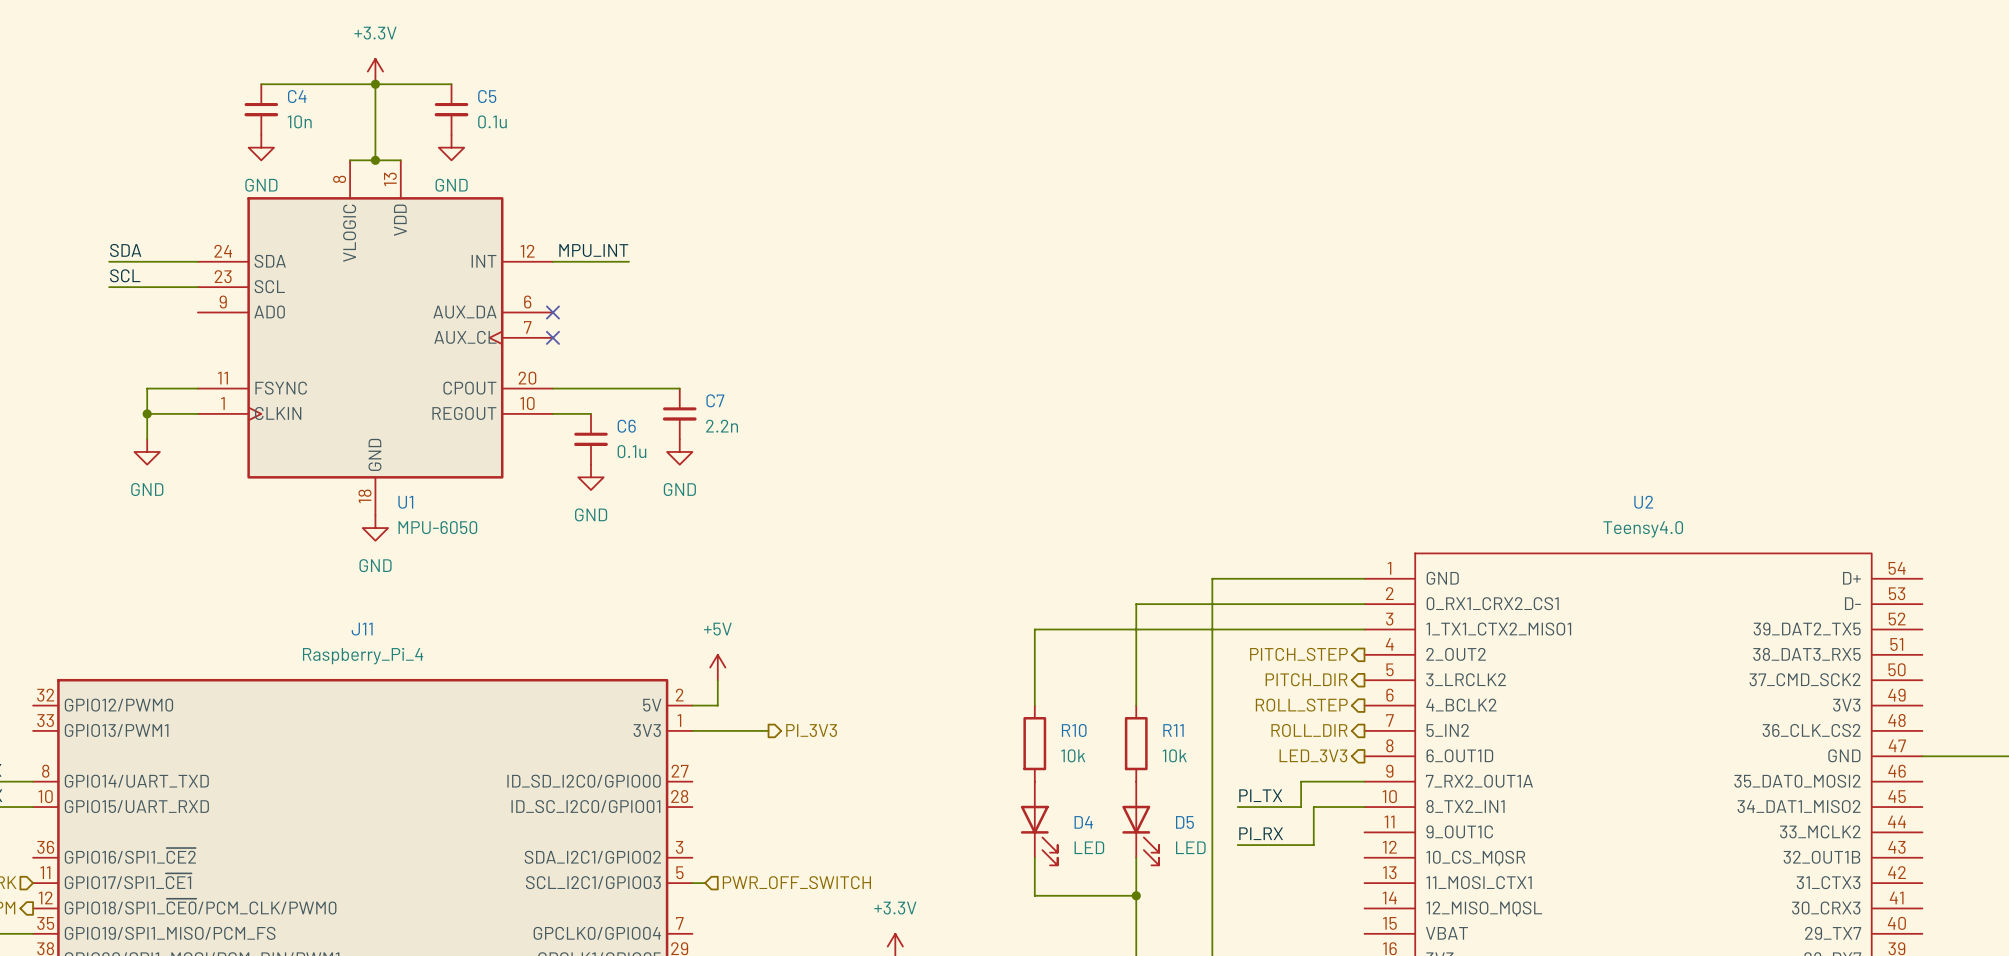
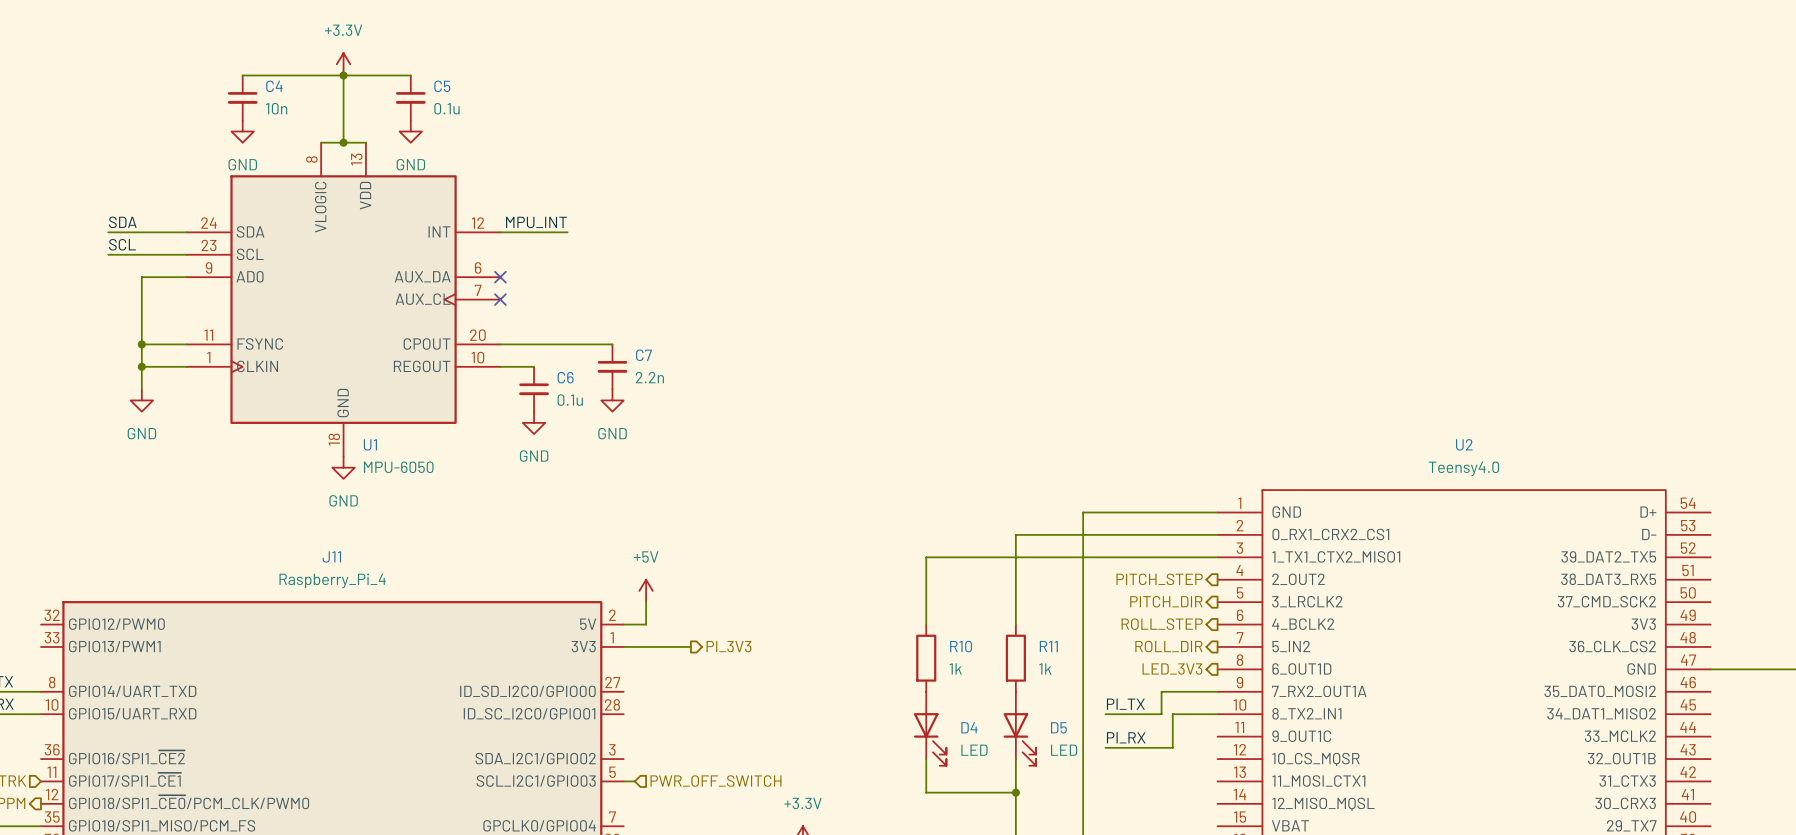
wire: none -> (186, 277) (141, 277) (141, 344)
junction: none -> (141, 344)
R10 value: 10k (1073, 755) -> 1k (955, 668)
R11 value: 10k (1174, 755) -> 1k (1045, 668)

